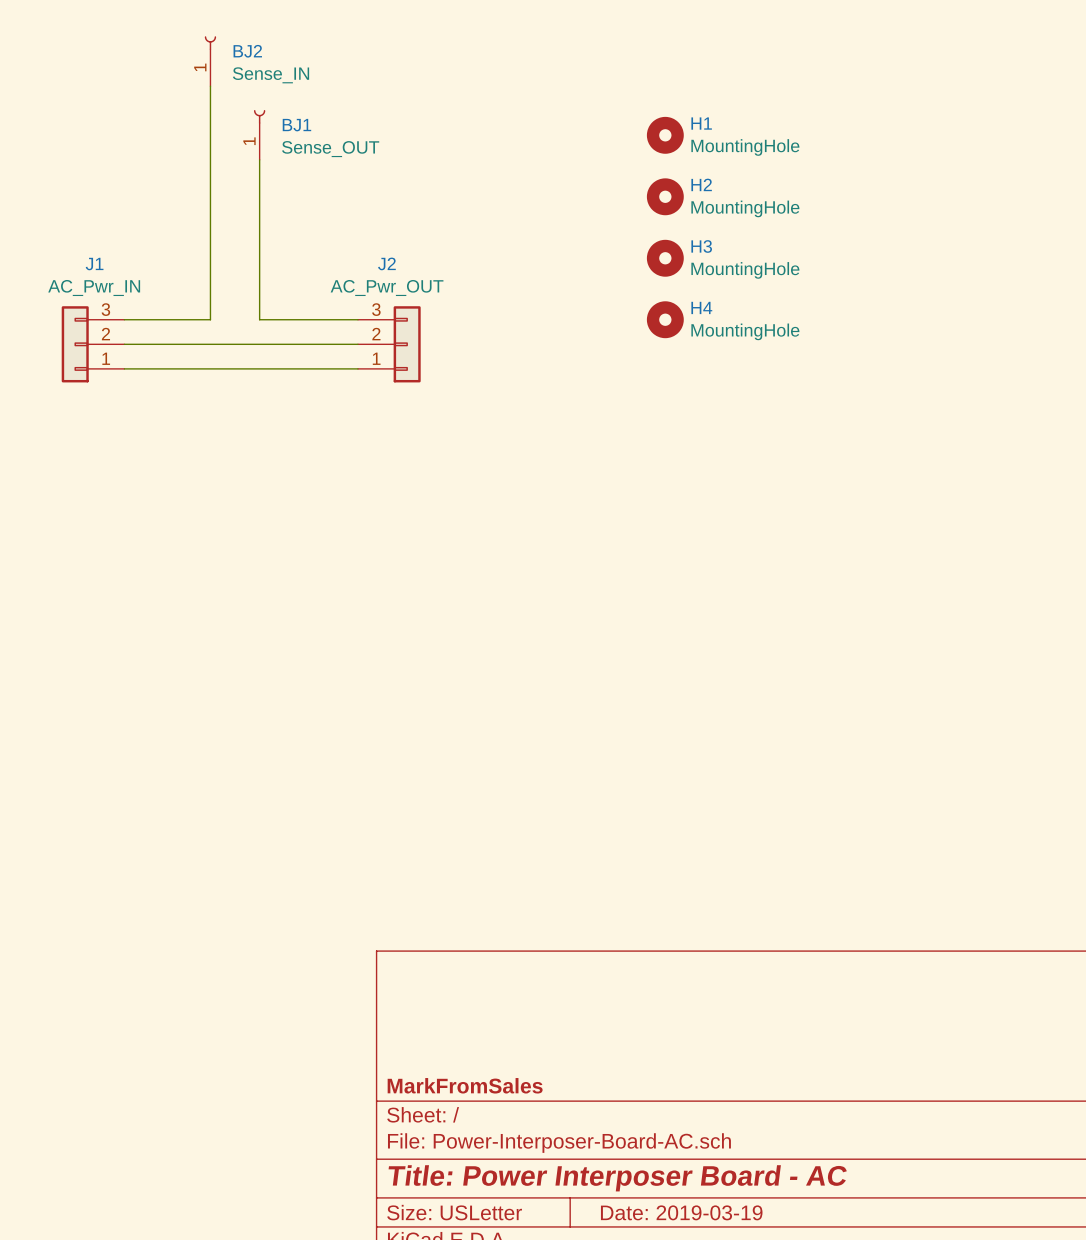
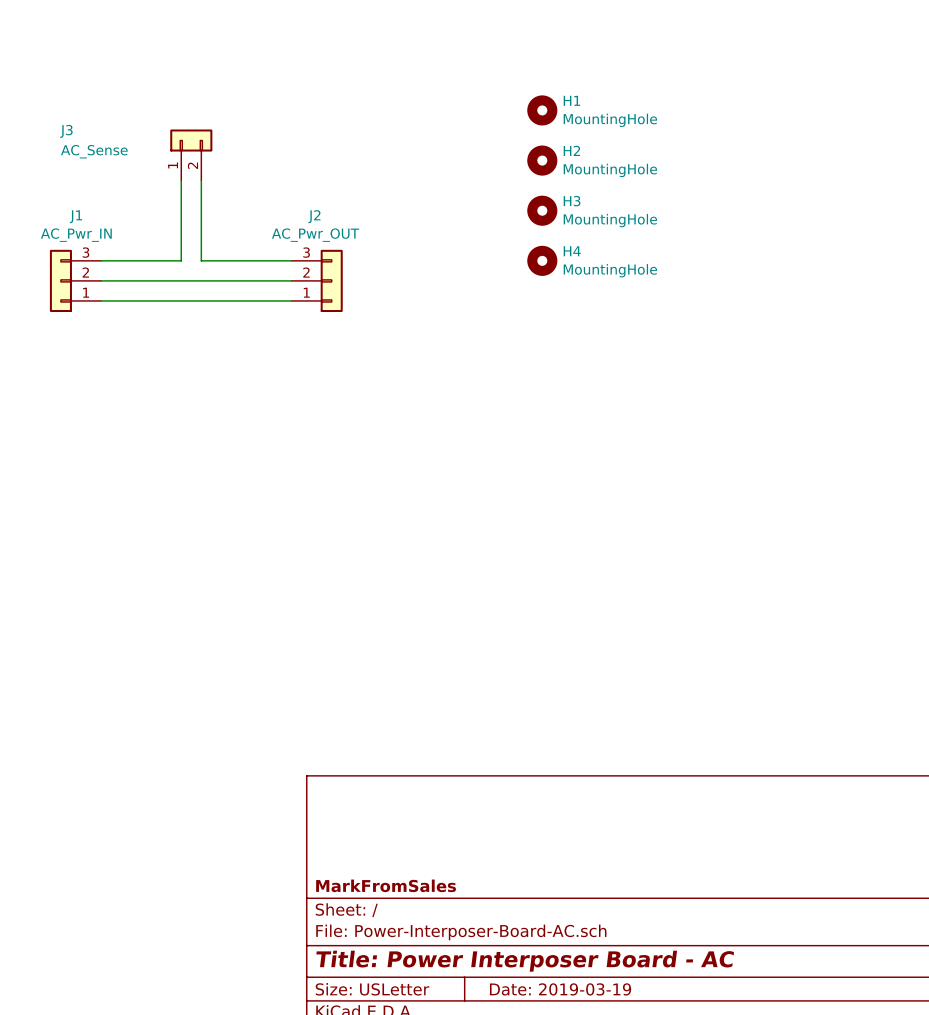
BJ2: Sense_IN (210, 61) -> none
wire: (210, 86) (210, 319) -> (181, 180) (181, 260) (171, 260)
BJ1: Sense_OUT (259, 134) -> none
wire: (259, 159) (259, 319) -> (201, 180) (201, 260) (211, 260)
J3: none -> AC_Sense (191, 155)

